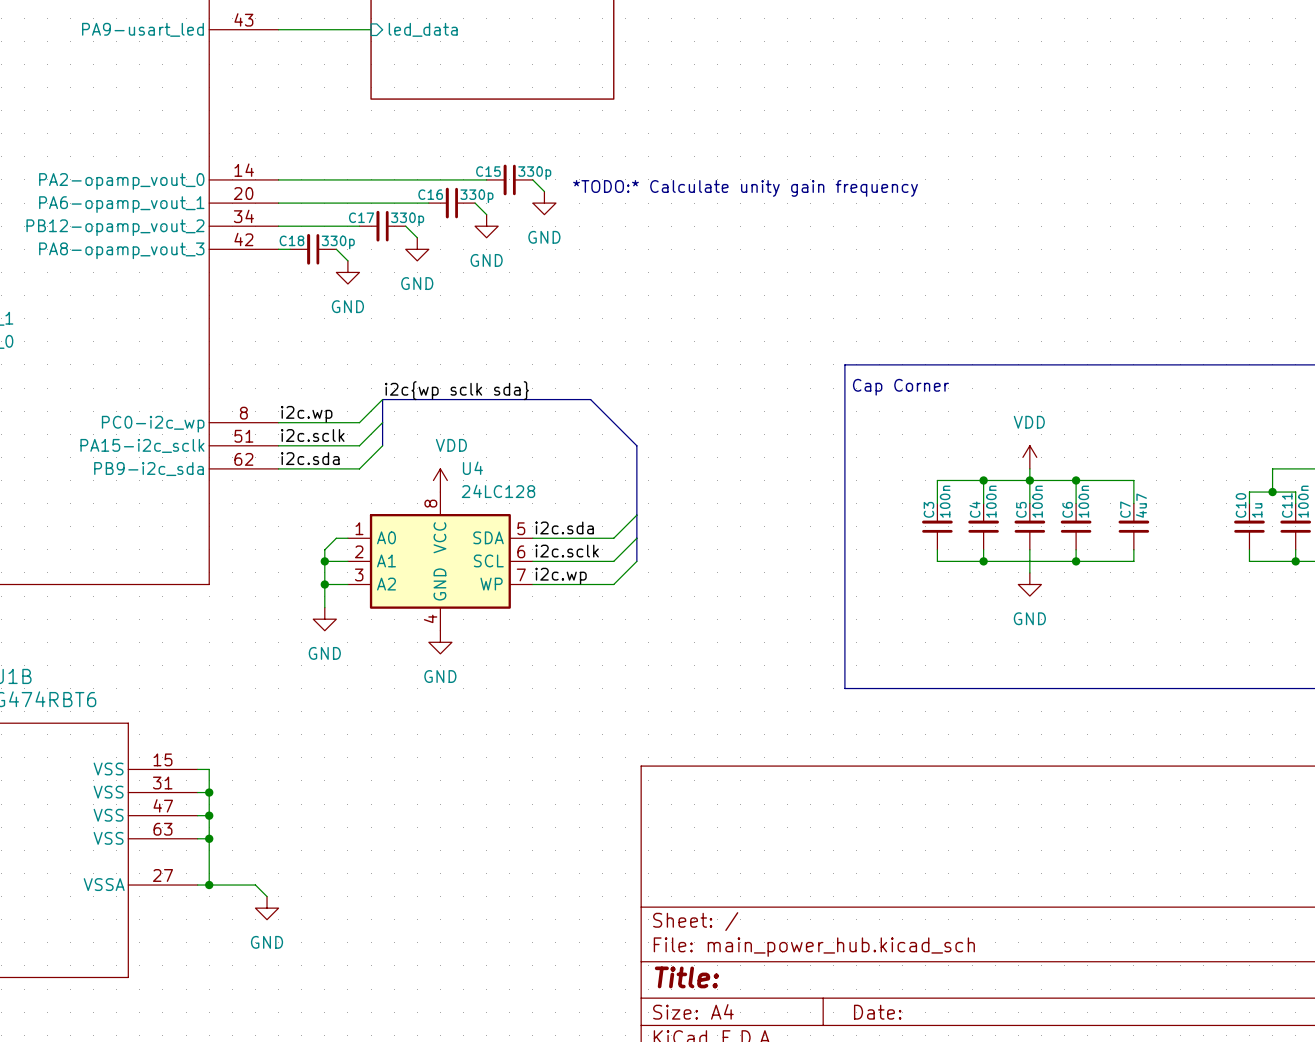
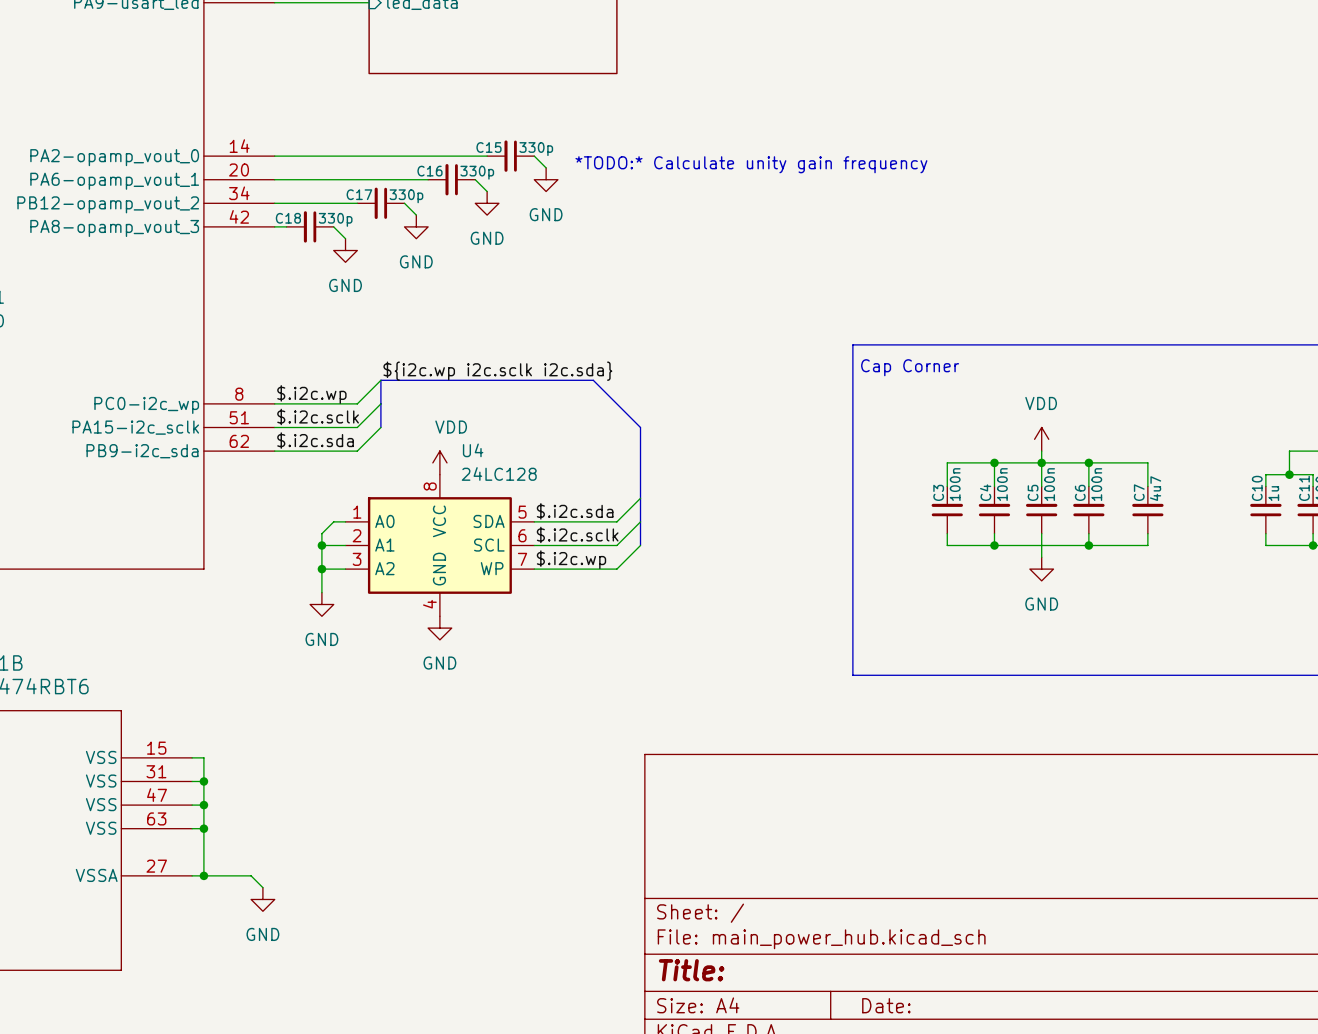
label: i2c{wp sclk sda} (456, 390) -> ${i2c.wp i2c.sclk i2c.sda} (497, 371)
label: i2c.wp (306, 414) -> $.i2c.wp (311, 394)
label: i2c.sclk (312, 435) -> $.i2c.sclk (318, 416)
label: i2c.sda (310, 458) -> $.i2c.sda (315, 440)
label: i2c.sda (564, 527) -> $.i2c.sda (575, 511)
label: i2c.sclk (567, 551) -> $.i2c.sclk (577, 534)
label: i2c.wp (561, 576) -> $.i2c.wp (571, 559)

